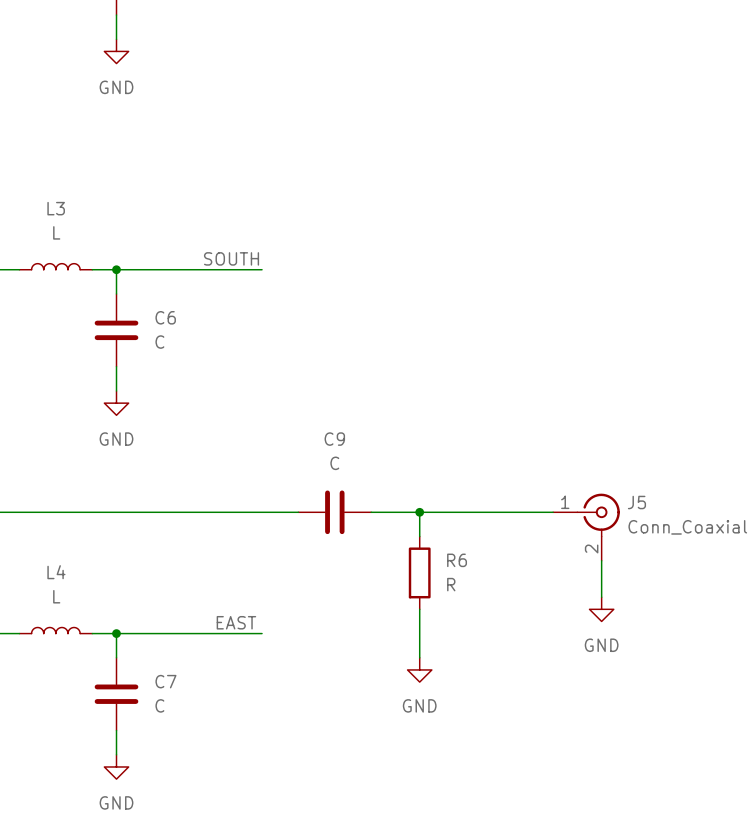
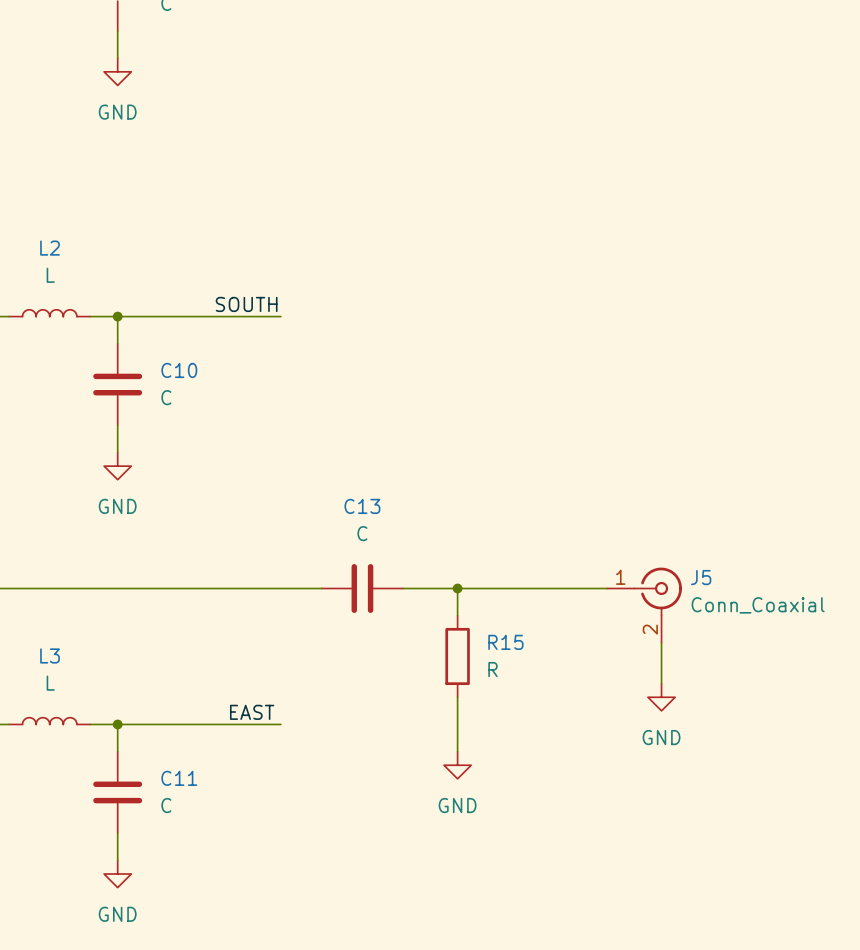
L3 name: L3 (56, 208) -> L2 (50, 248)
C6 name: C6 (165, 317) -> C10 (179, 370)
C9 name: C9 (334, 439) -> C13 (362, 506)
R6 name: R6 (457, 560) -> R15 (505, 642)
L4 name: L4 (56, 572) -> L3 (50, 655)
C7 name: C7 (165, 681) -> C11 (179, 778)

